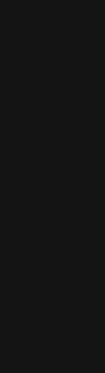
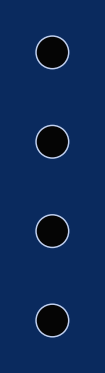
part: none -> (52, 52)
part: none -> (52, 141)
part: none -> (52, 231)
part: none -> (52, 320)

